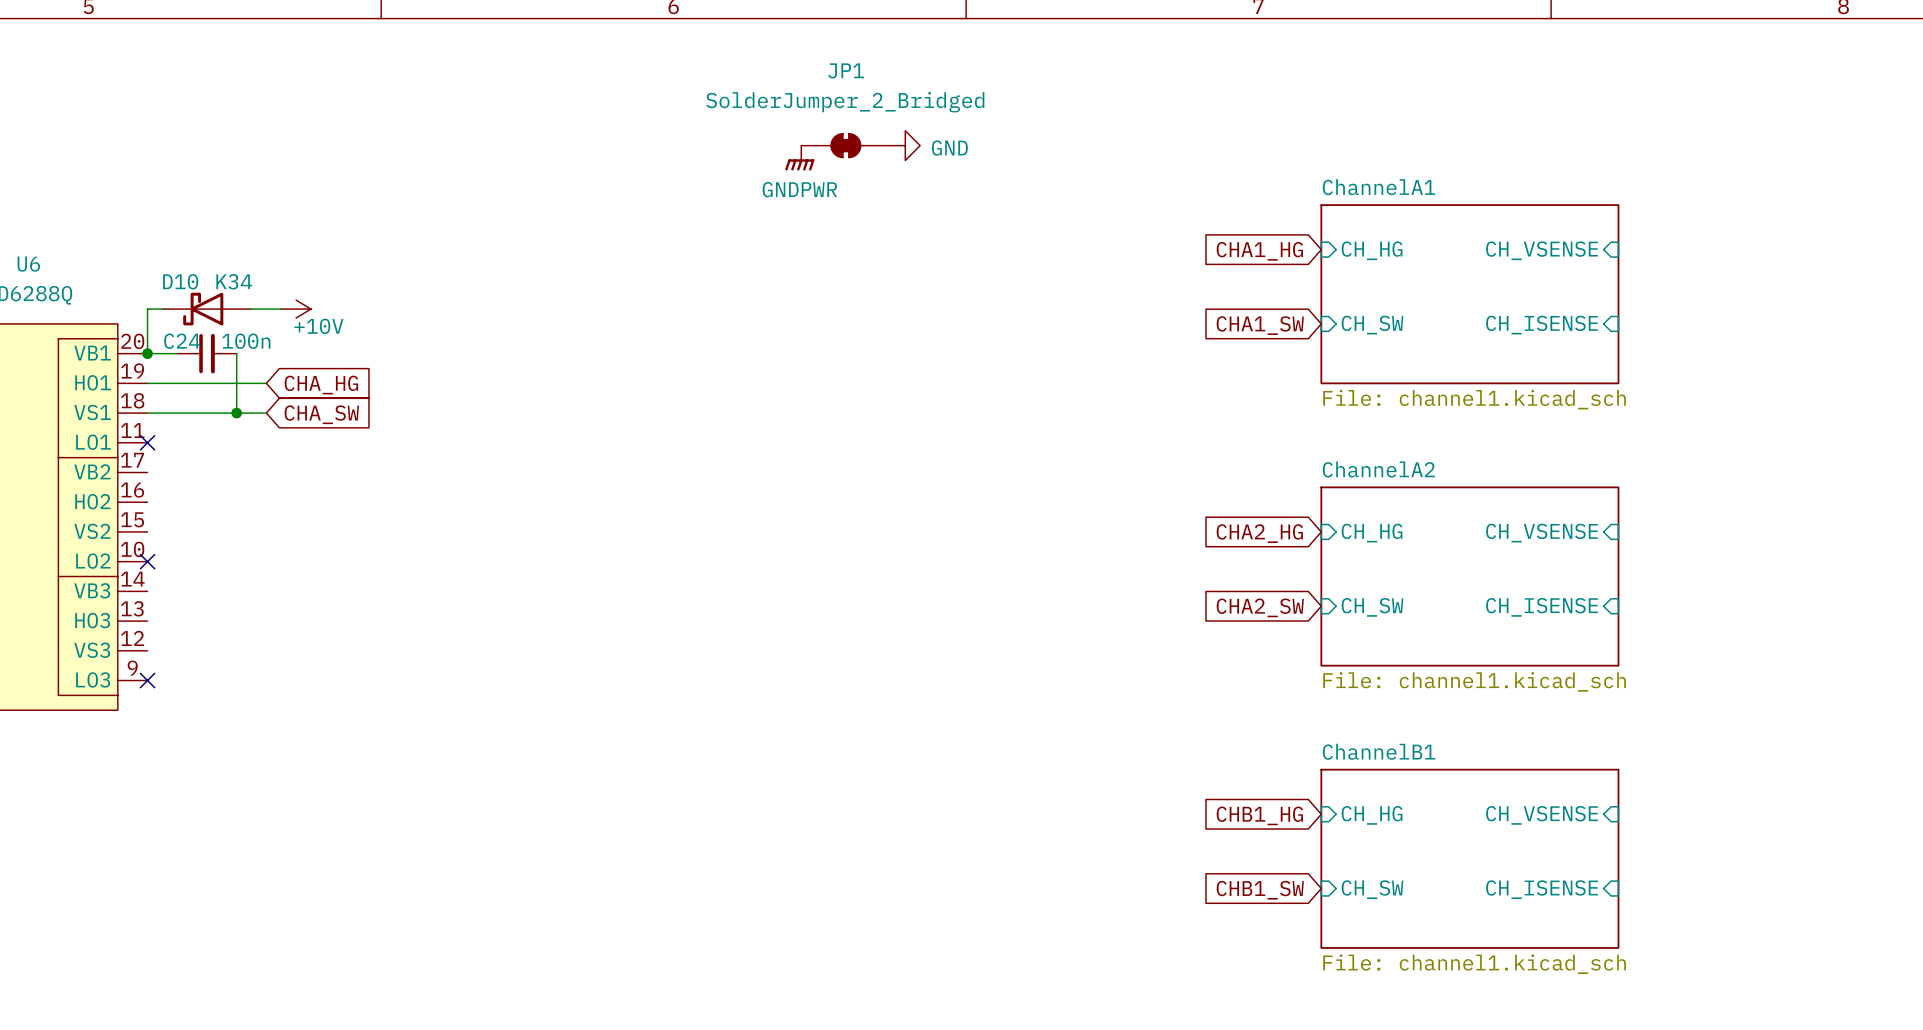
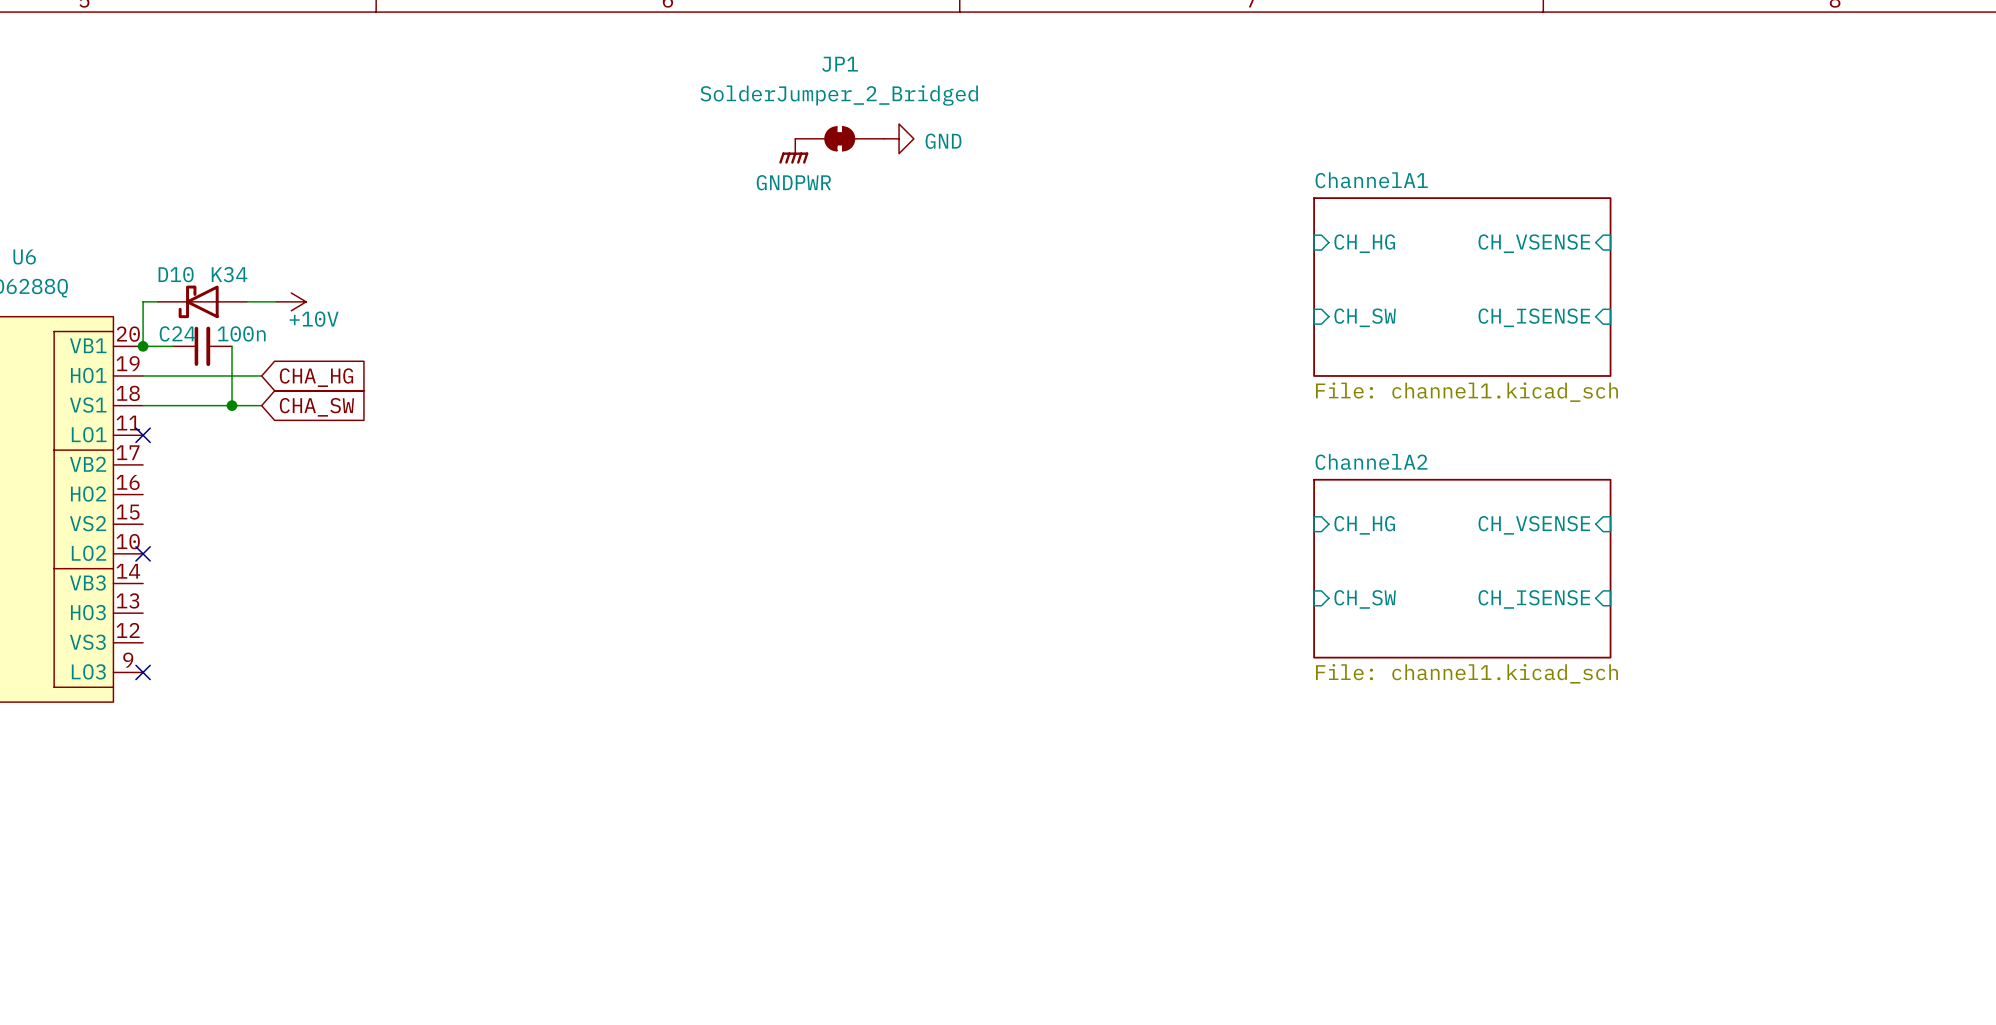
global label: CHA1_HG (1259, 251) -> none
global label: CHA1_SW (1260, 325) -> none
global label: CHA2_HG (1259, 533) -> none
global label: CHA2_SW (1260, 607) -> none
global label: CHB1_HG (1259, 815) -> none
sheet pin: CH_HG (1372, 815) -> none
sheet pin: CH_VSENSE (1542, 815) -> none
sheet ChannelB1: File: channel1.kicad_sch (1469, 858) -> none
sheet pin: CH_SW (1372, 889) -> none
sheet pin: CH_ISENSE (1542, 889) -> none
global label: CHB1_SW (1260, 890) -> none

